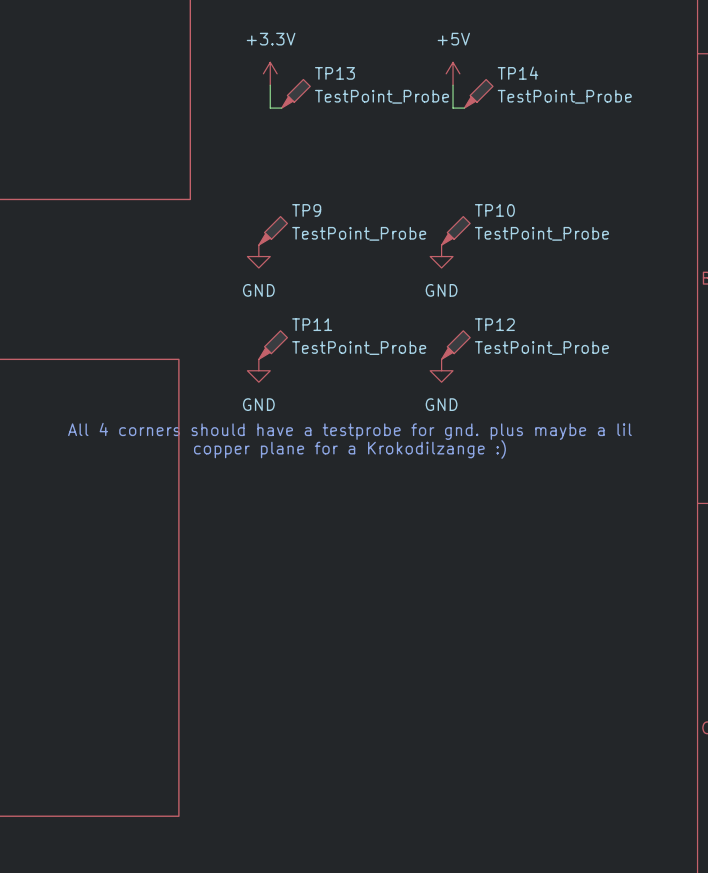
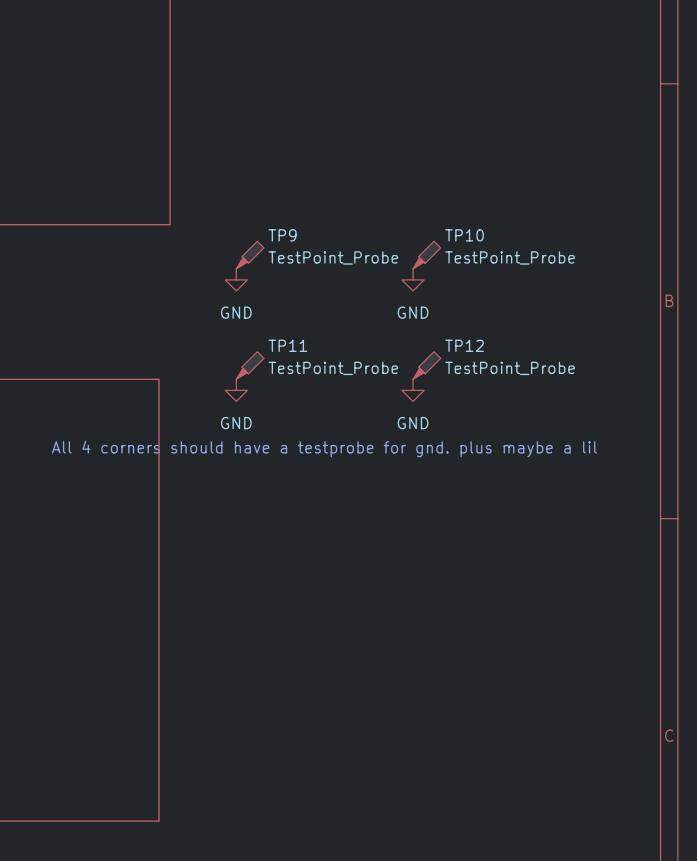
power symbol: +3.3V (270, 73) -> none
power symbol: +5V (453, 73) -> none
wire: (270, 85) (270, 108) (281, 108) -> none
wire: (453, 85) (453, 108) (464, 108) -> none
TP13: TestPoint_Probe (295, 93) -> none
TP14: TestPoint_Probe (478, 93) -> none
text: copper plane for a Krokodilzange :) (349, 449) -> none

